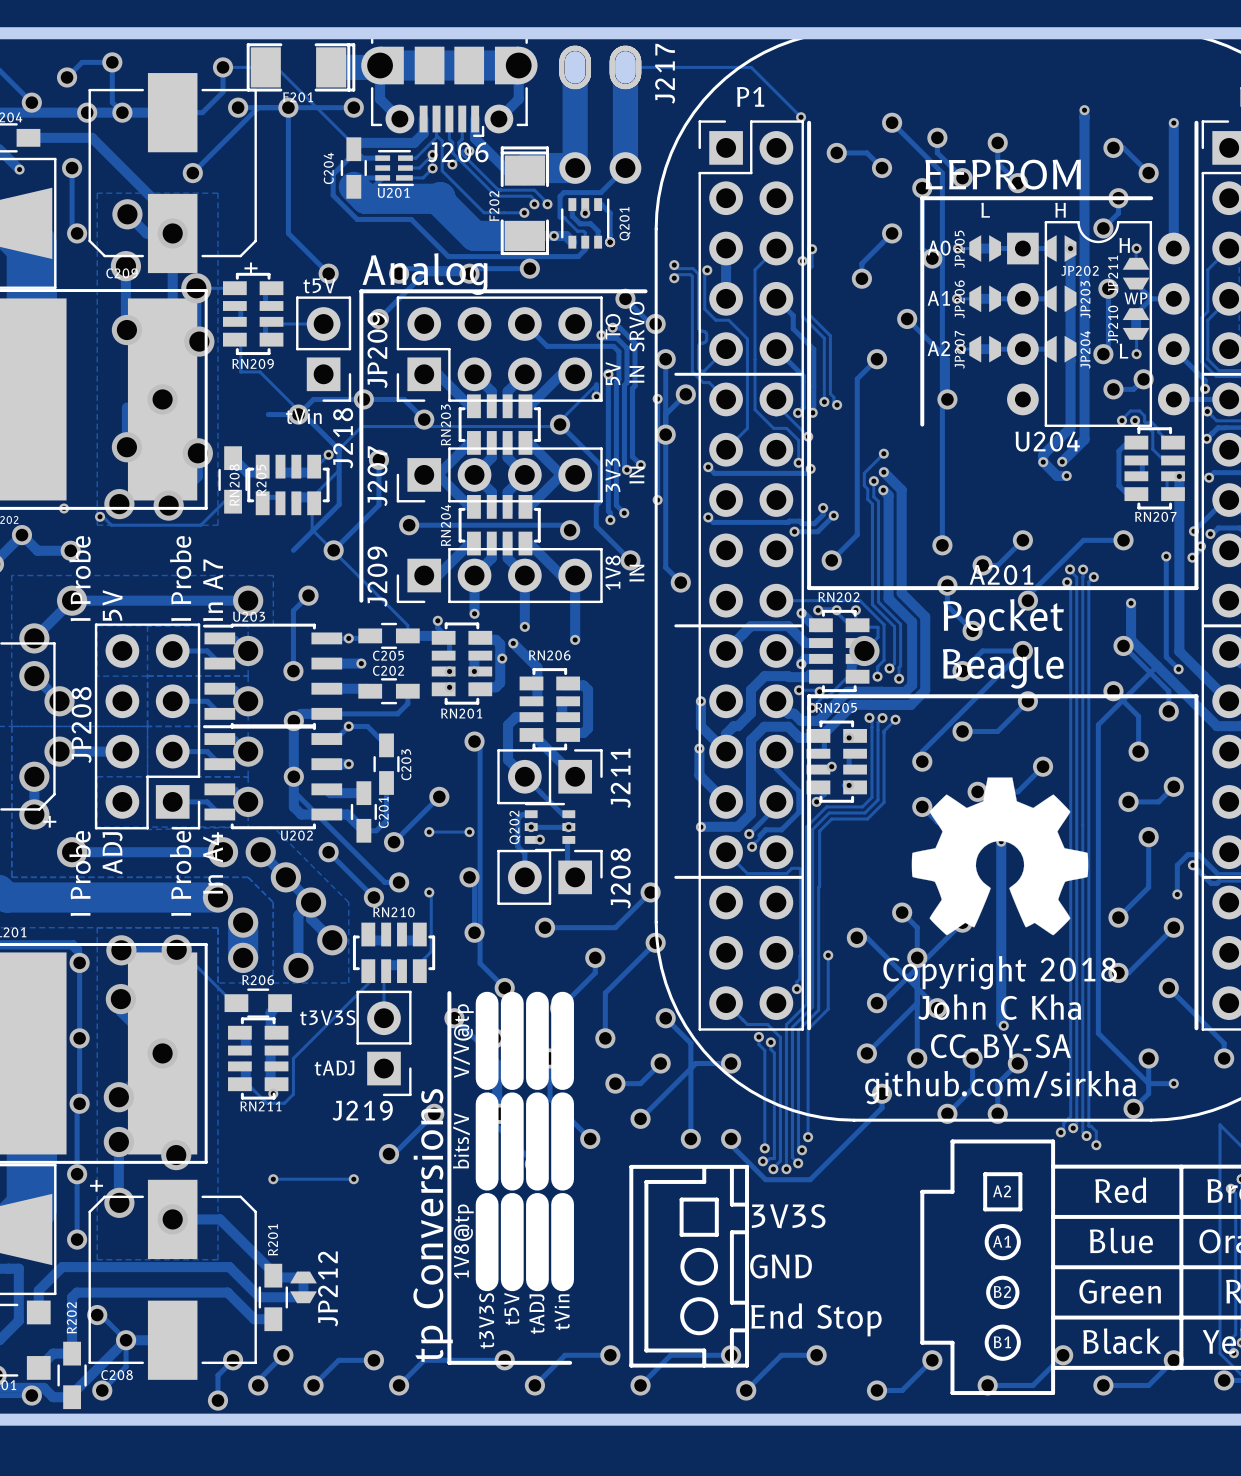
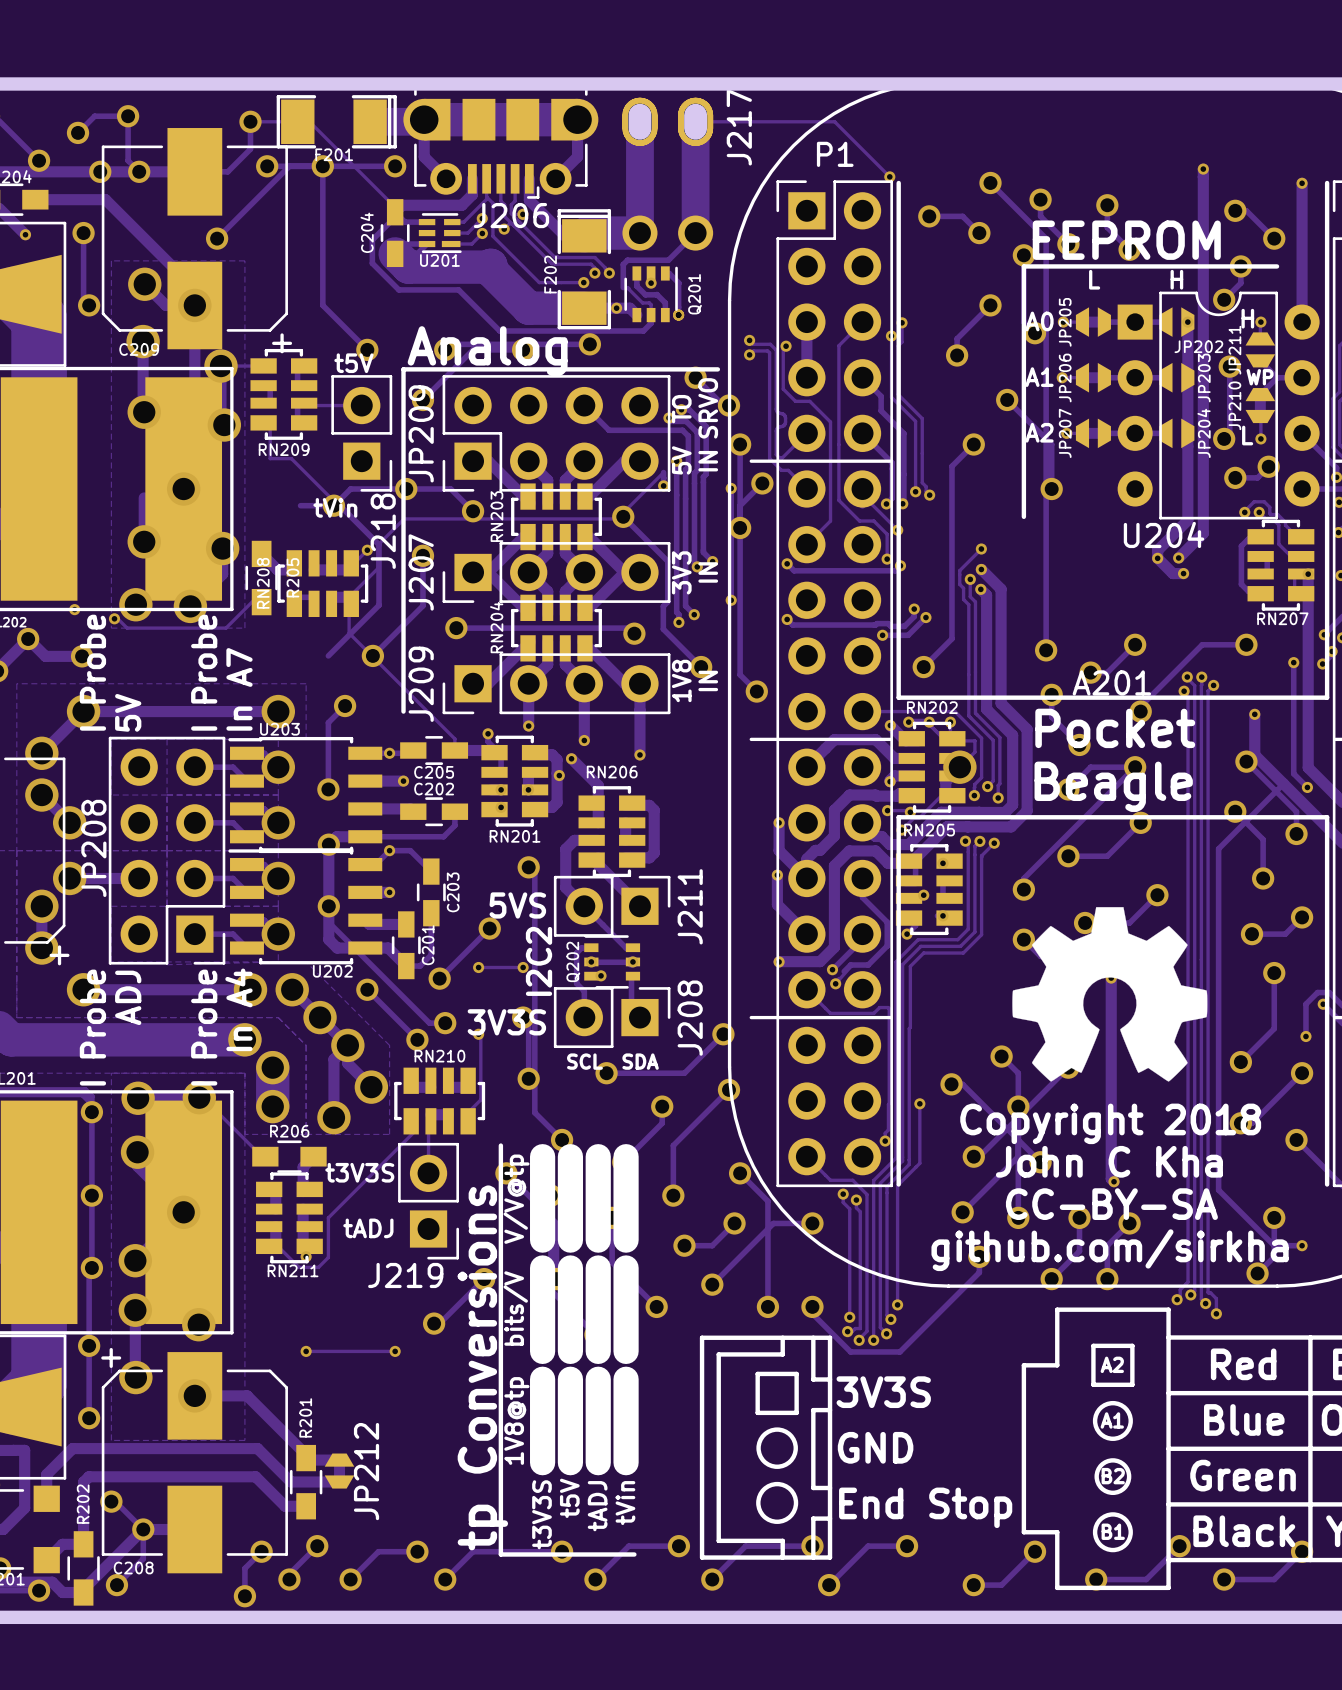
text: none -> 5VS (517, 905)
text: none -> I2C2 (539, 961)
text: none -> 3V3S (506, 1022)
text: none -> SCL (584, 1061)
text: none -> SDA (640, 1061)

